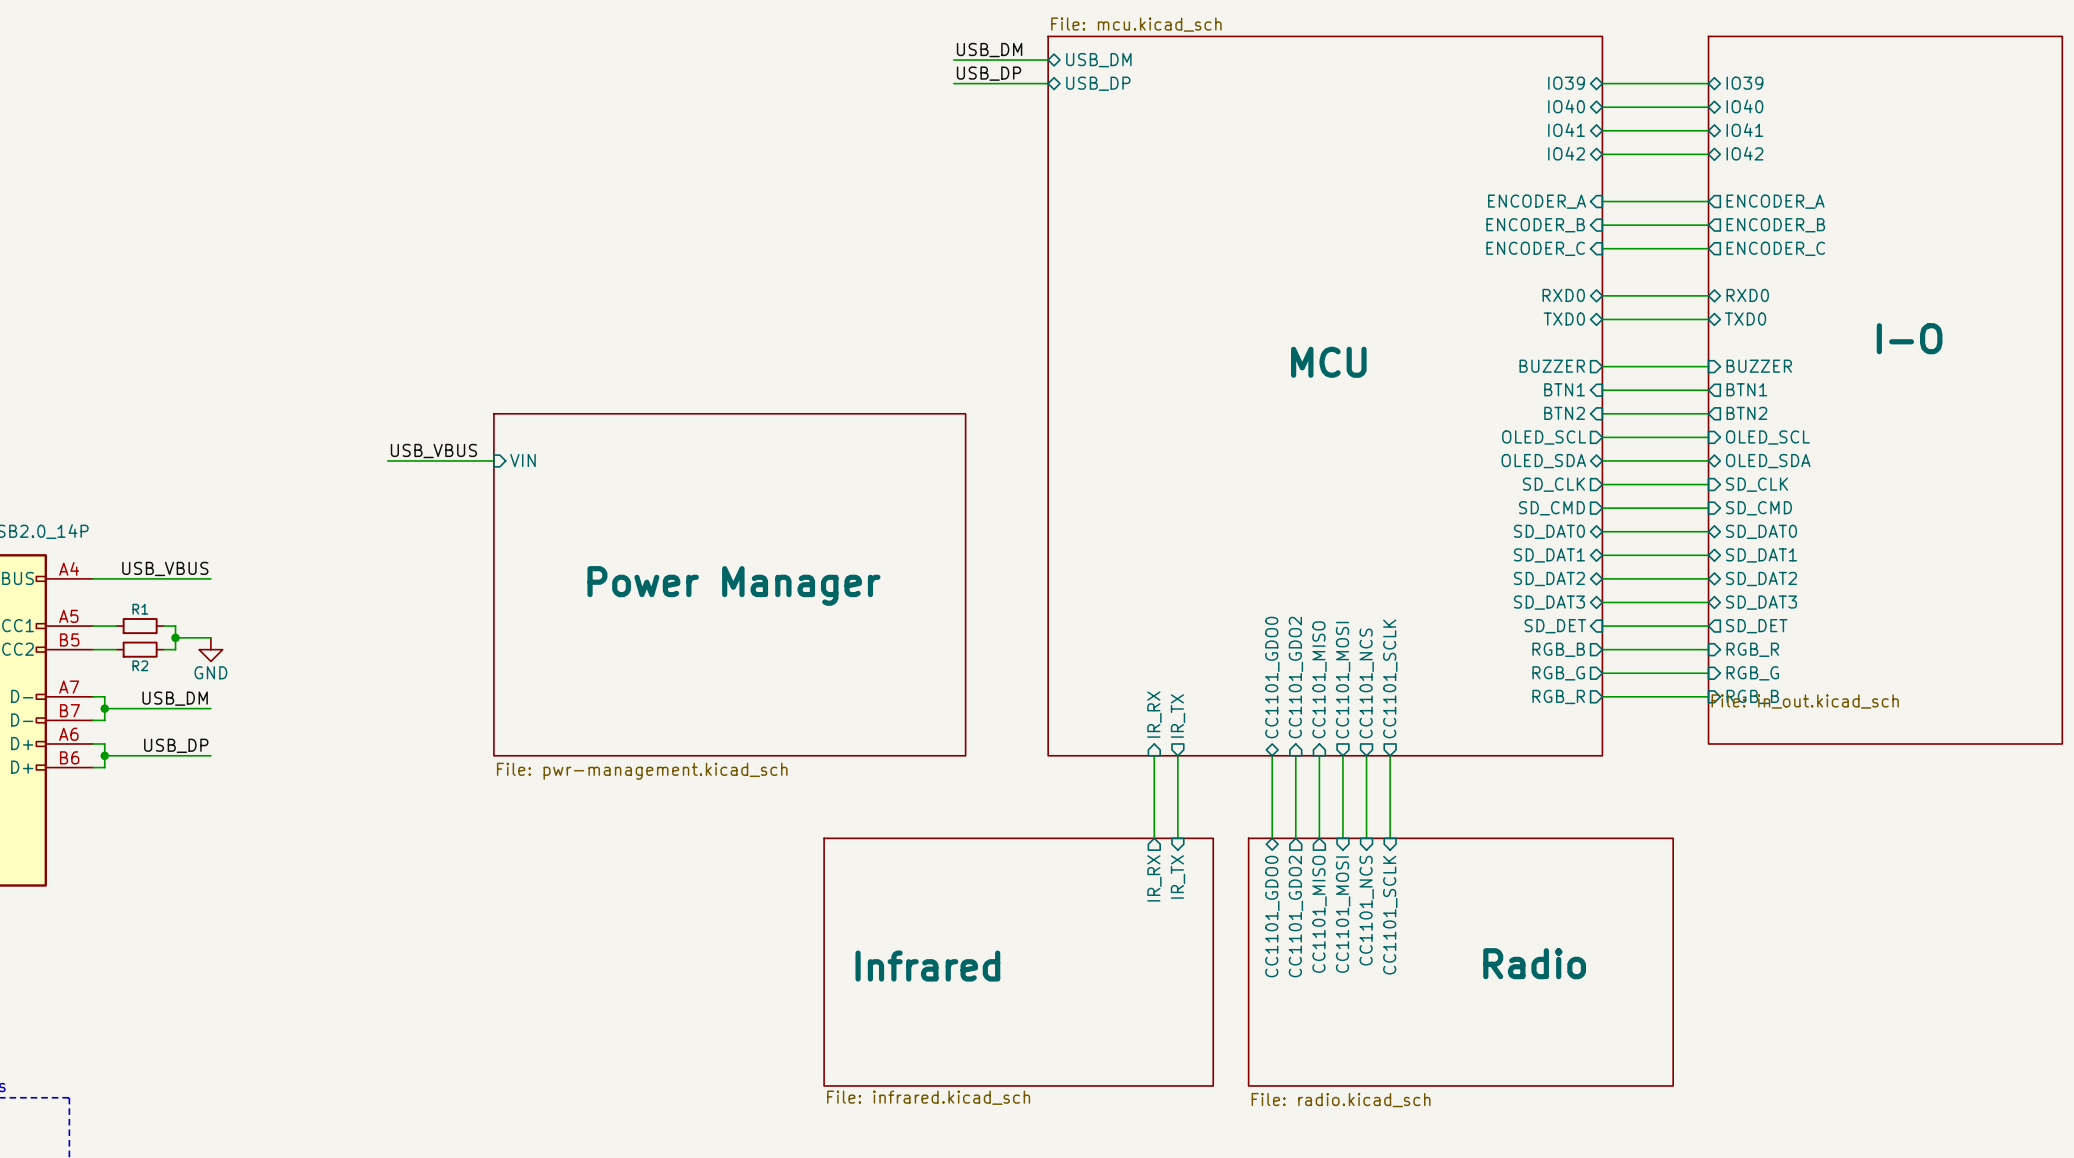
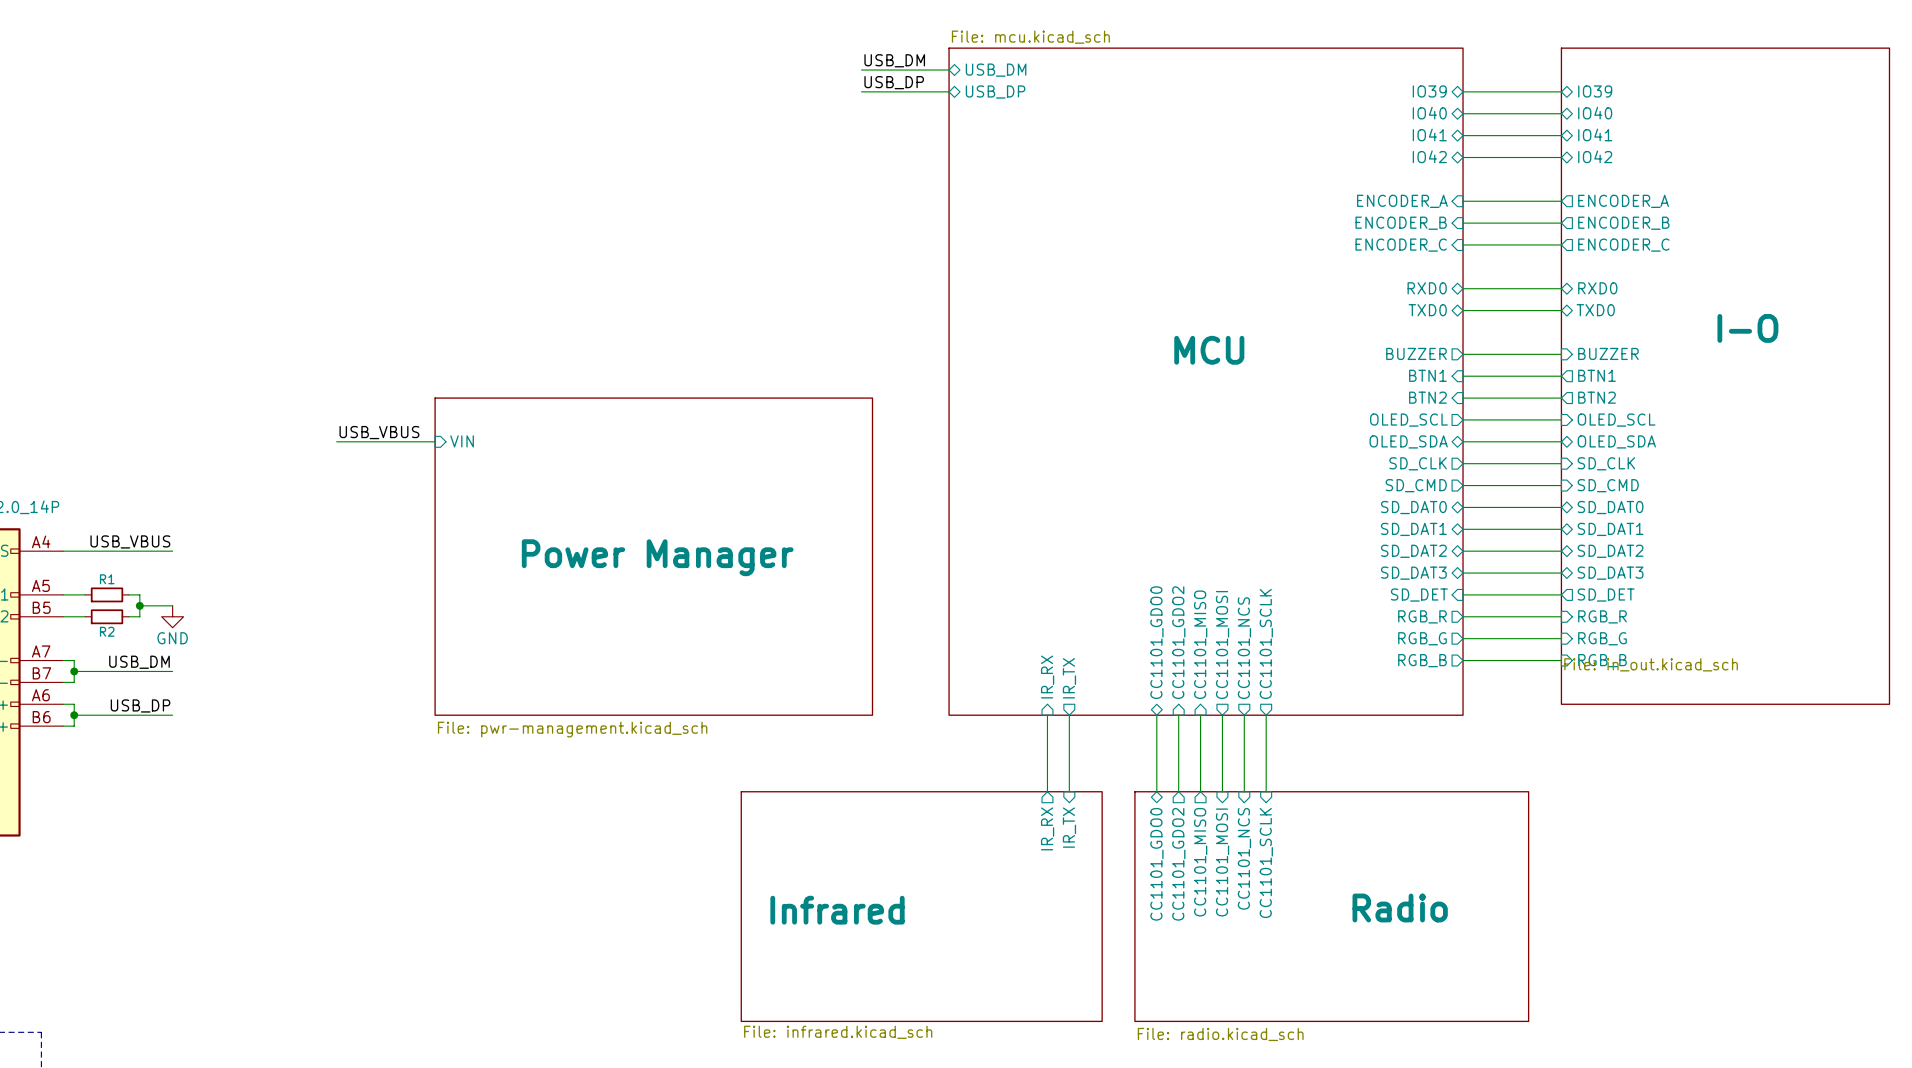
sheet pin: RGB_B (1558, 649) -> RGB_R (1422, 616)
sheet pin: RGB_R (1558, 696) -> RGB_B (1422, 660)

